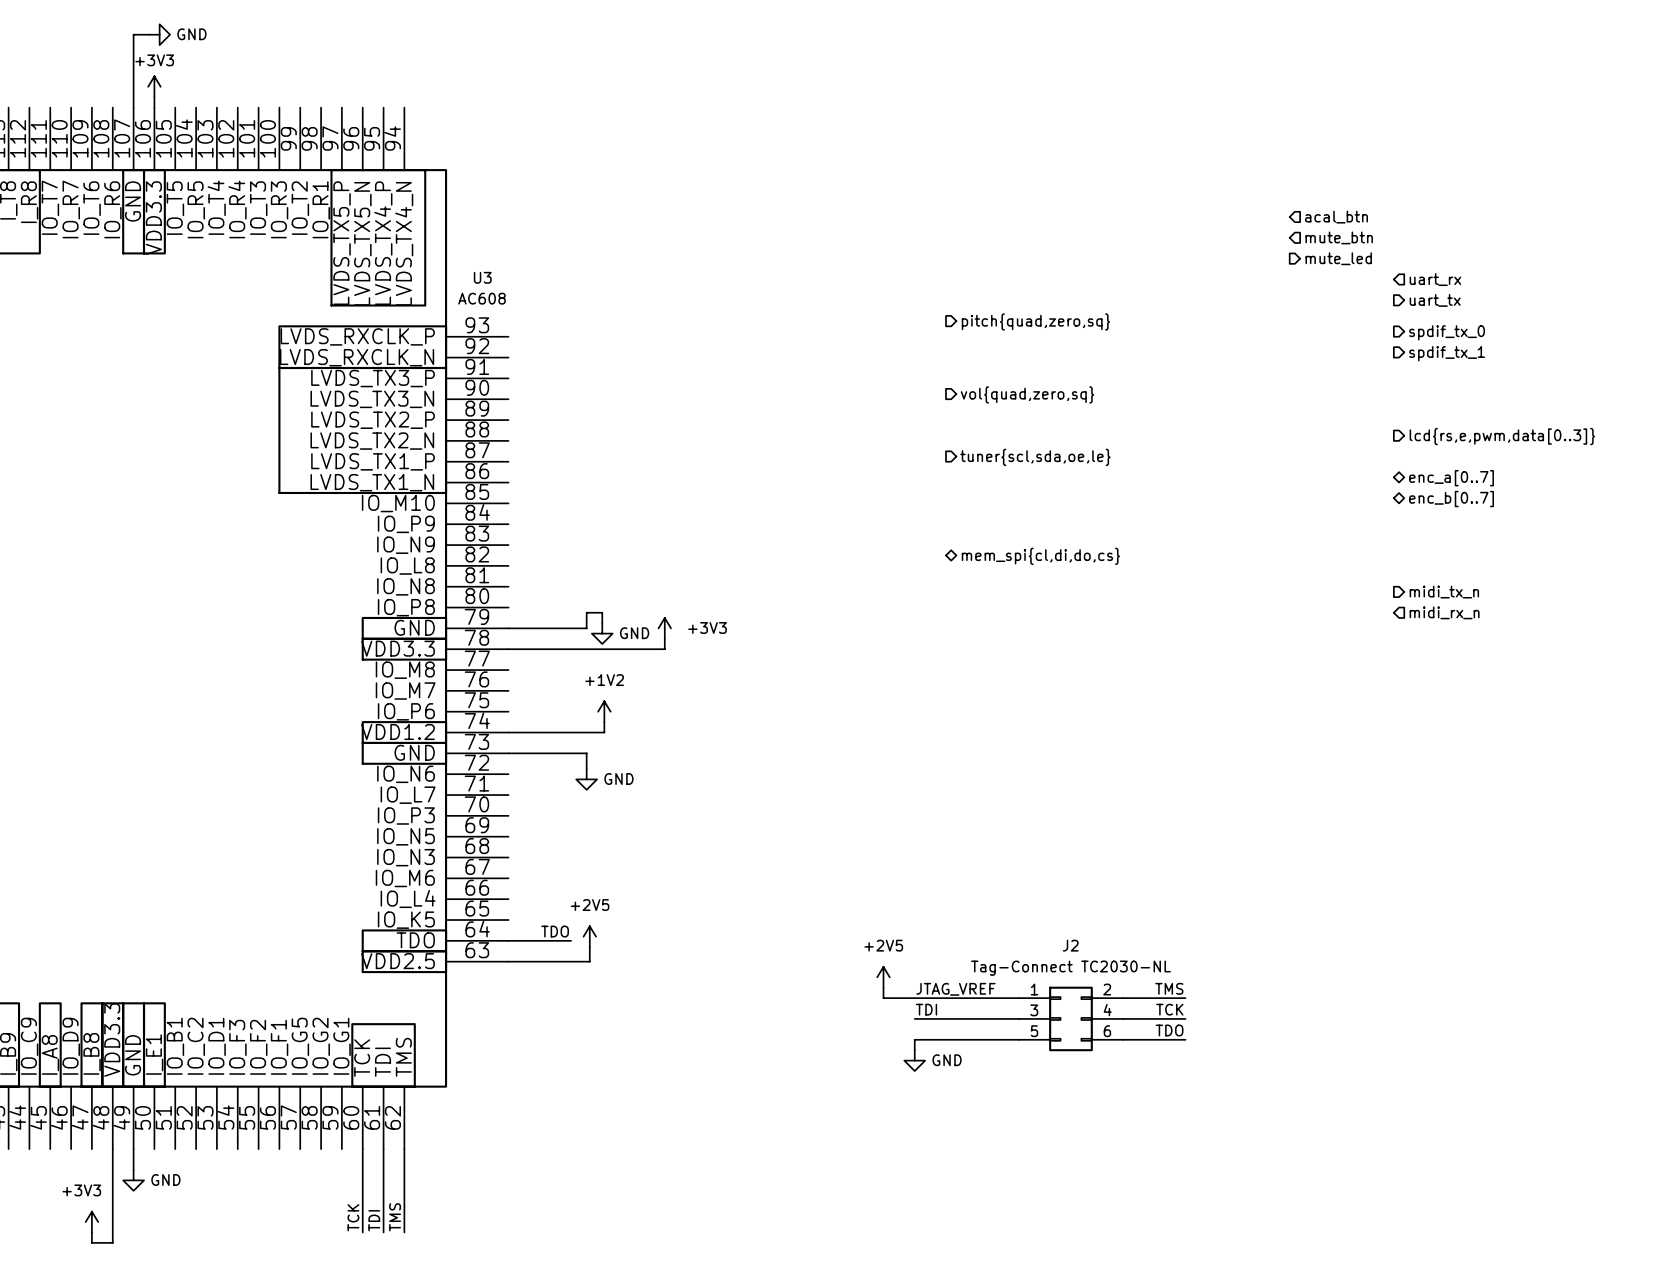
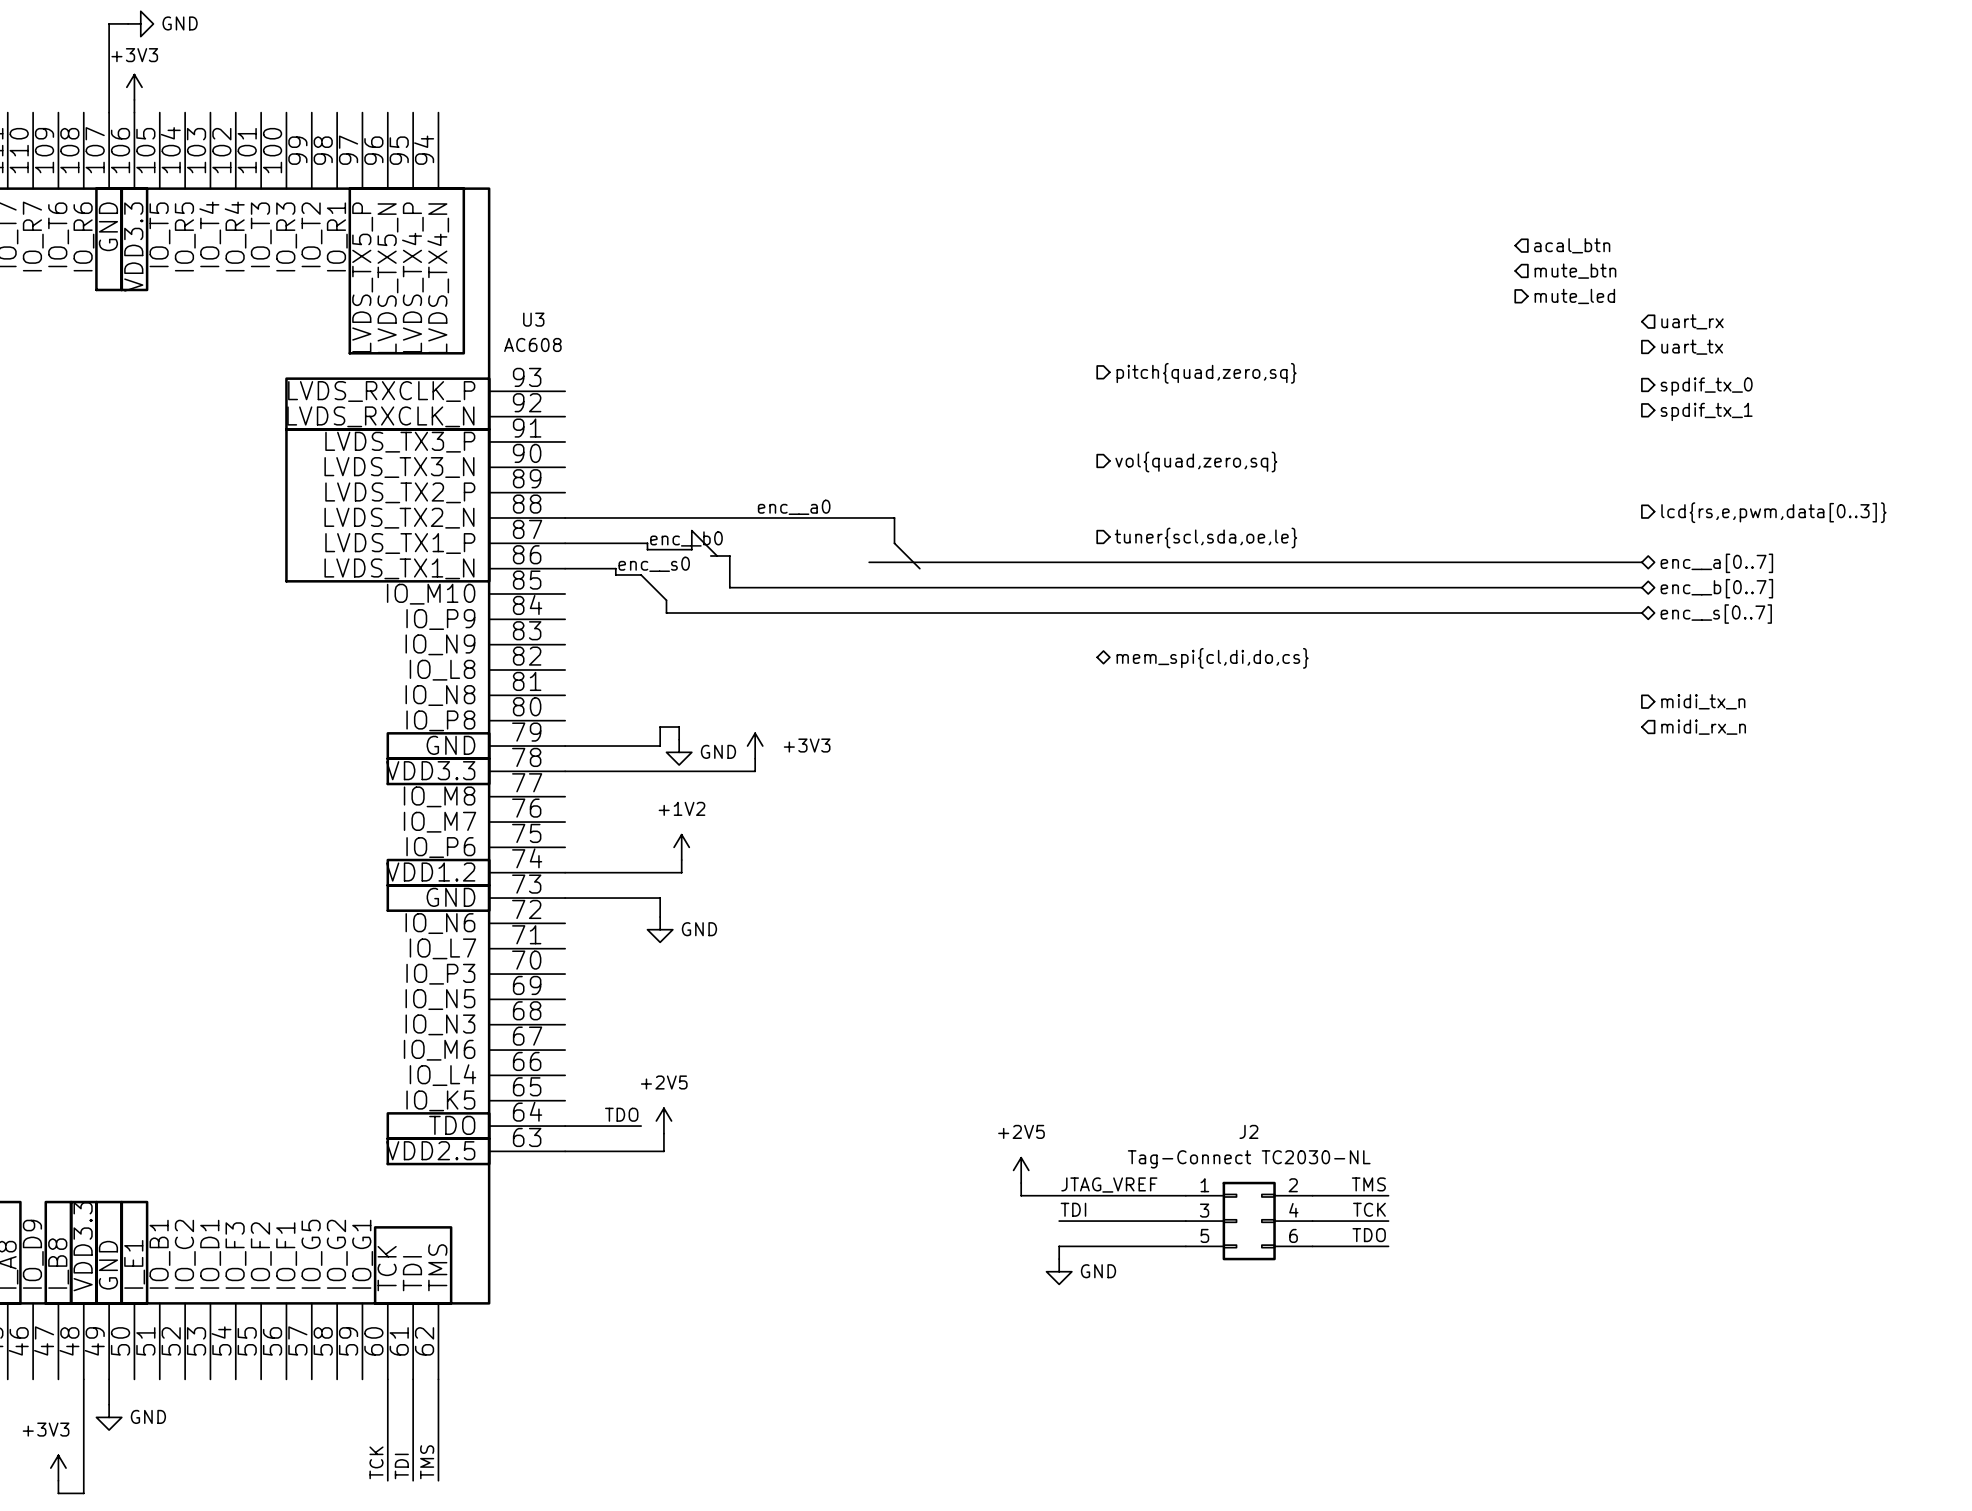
label: none -> enc__a0 (794, 507)
wire: none -> (565, 517) (894, 517) (894, 543) (919, 568)
label: none -> enc__b0 (686, 538)
wire: none -> (565, 543) (647, 543) (647, 549) (691, 549) (691, 530) (717, 555)
bus: none -> (710, 555) (729, 555) (729, 587) (1641, 587)
bus: none -> (869, 562) (1641, 562)
label: none -> enc__s0 (654, 564)
hierarchical label: enc_a[0..7] (1451, 478) -> enc__a[0..7] (1716, 563)
wire: none -> (565, 568) (615, 568) (615, 574) (641, 574) (666, 600)
hierarchical label: enc_b[0..7] (1451, 499) -> enc__b[0..7] (1716, 588)
bus: none -> (666, 600) (666, 613) (1641, 613)
hierarchical label: none -> enc__s[0..7] (1716, 614)

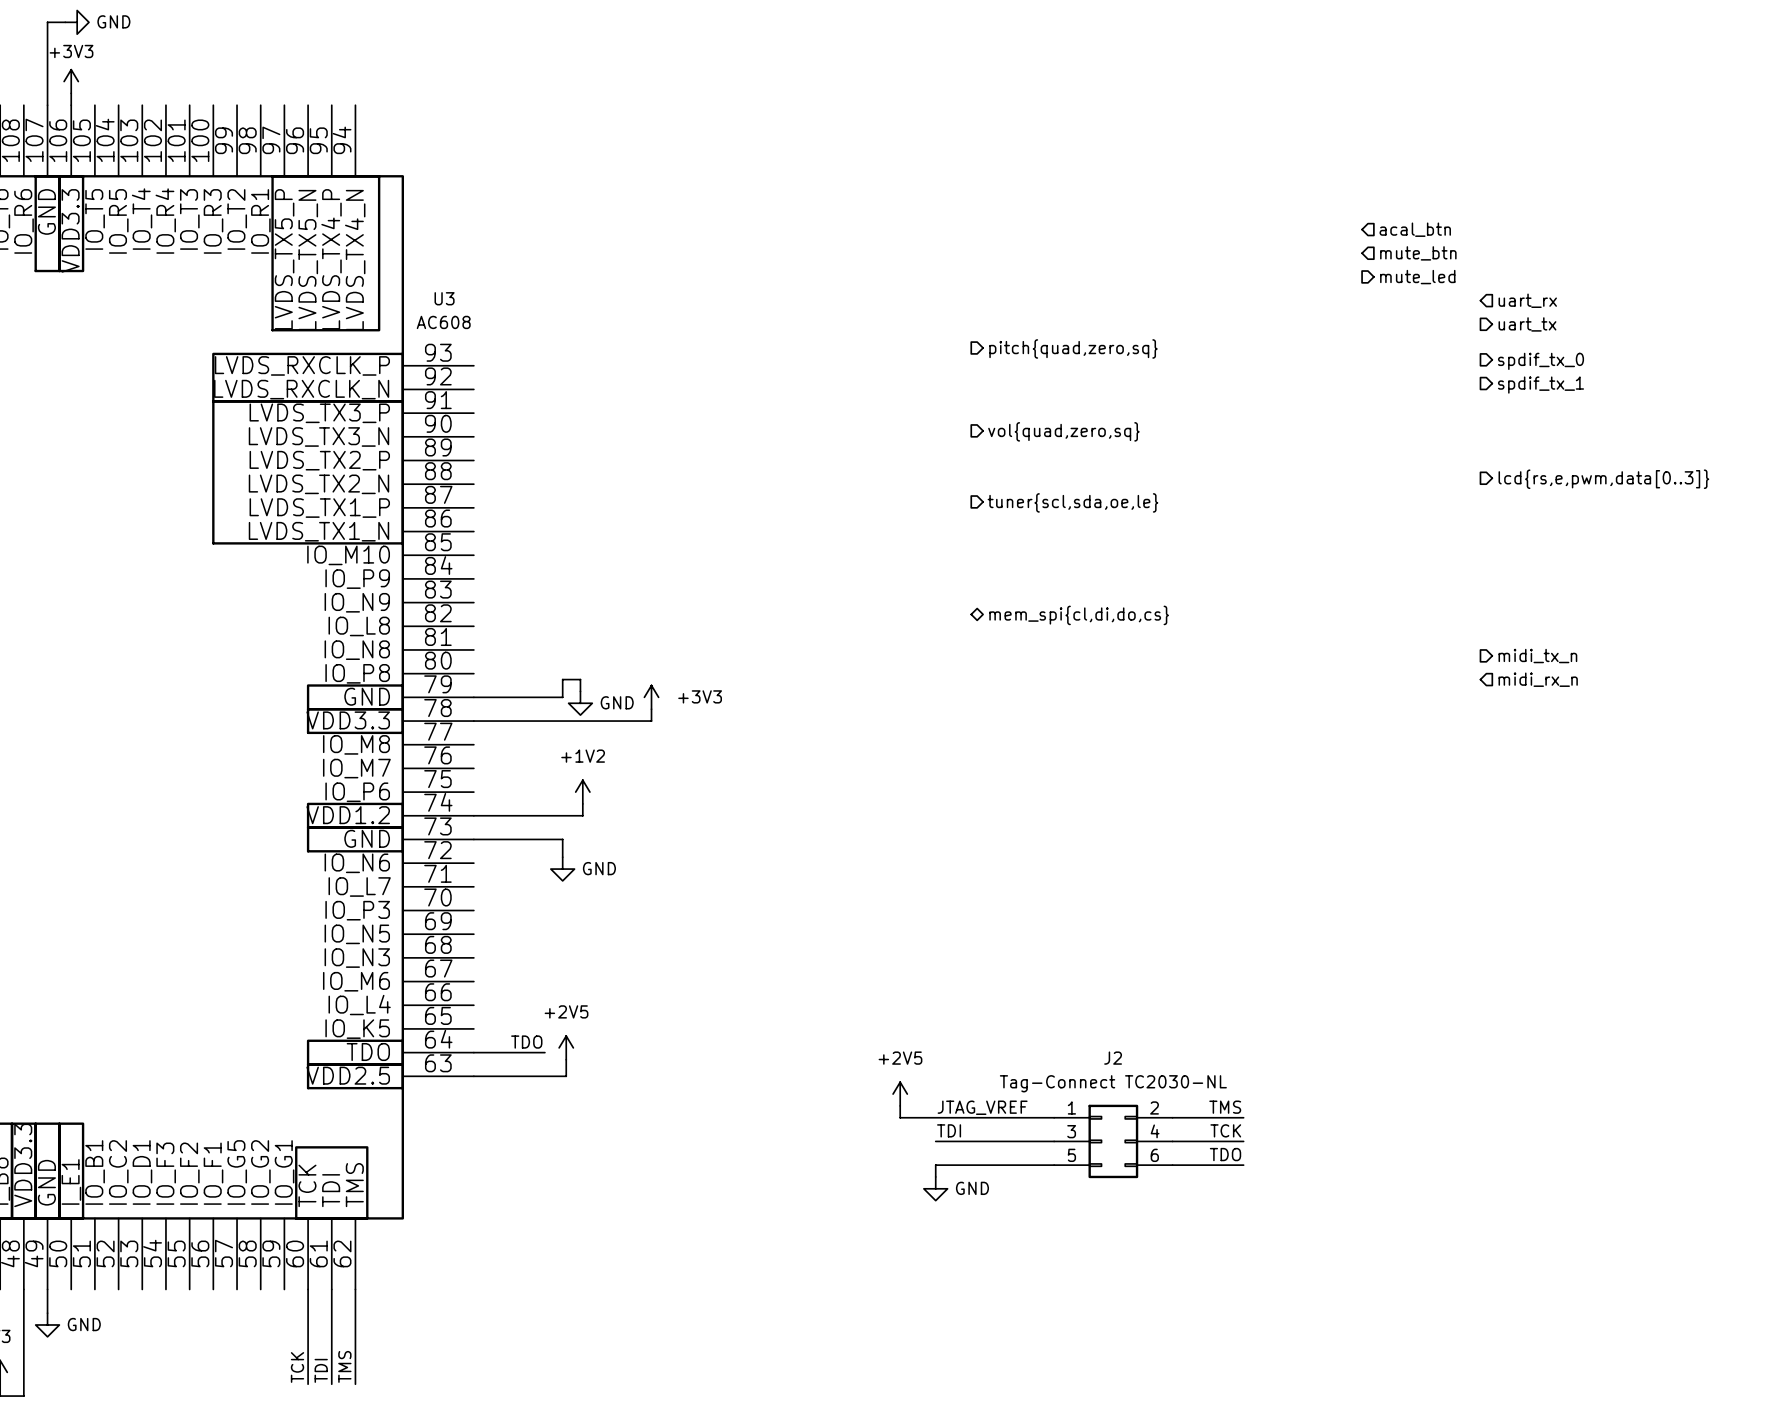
label: enc__a0 (794, 507) -> none
wire: (565, 517) (894, 517) (894, 543) (919, 568) -> none
label: enc__b0 (686, 538) -> none
wire: (565, 543) (647, 543) (647, 549) (691, 549) (691, 530) (717, 555) -> none
bus: (710, 555) (729, 555) (729, 587) (1641, 587) -> none
bus: (869, 562) (1641, 562) -> none
hierarchical label: enc__a[0..7] (1716, 563) -> none
label: enc__s0 (654, 564) -> none
wire: (565, 568) (615, 568) (615, 574) (641, 574) (666, 600) -> none
hierarchical label: enc__b[0..7] (1716, 588) -> none
bus: (666, 600) (666, 613) (1641, 613) -> none
hierarchical label: enc__s[0..7] (1716, 614) -> none

